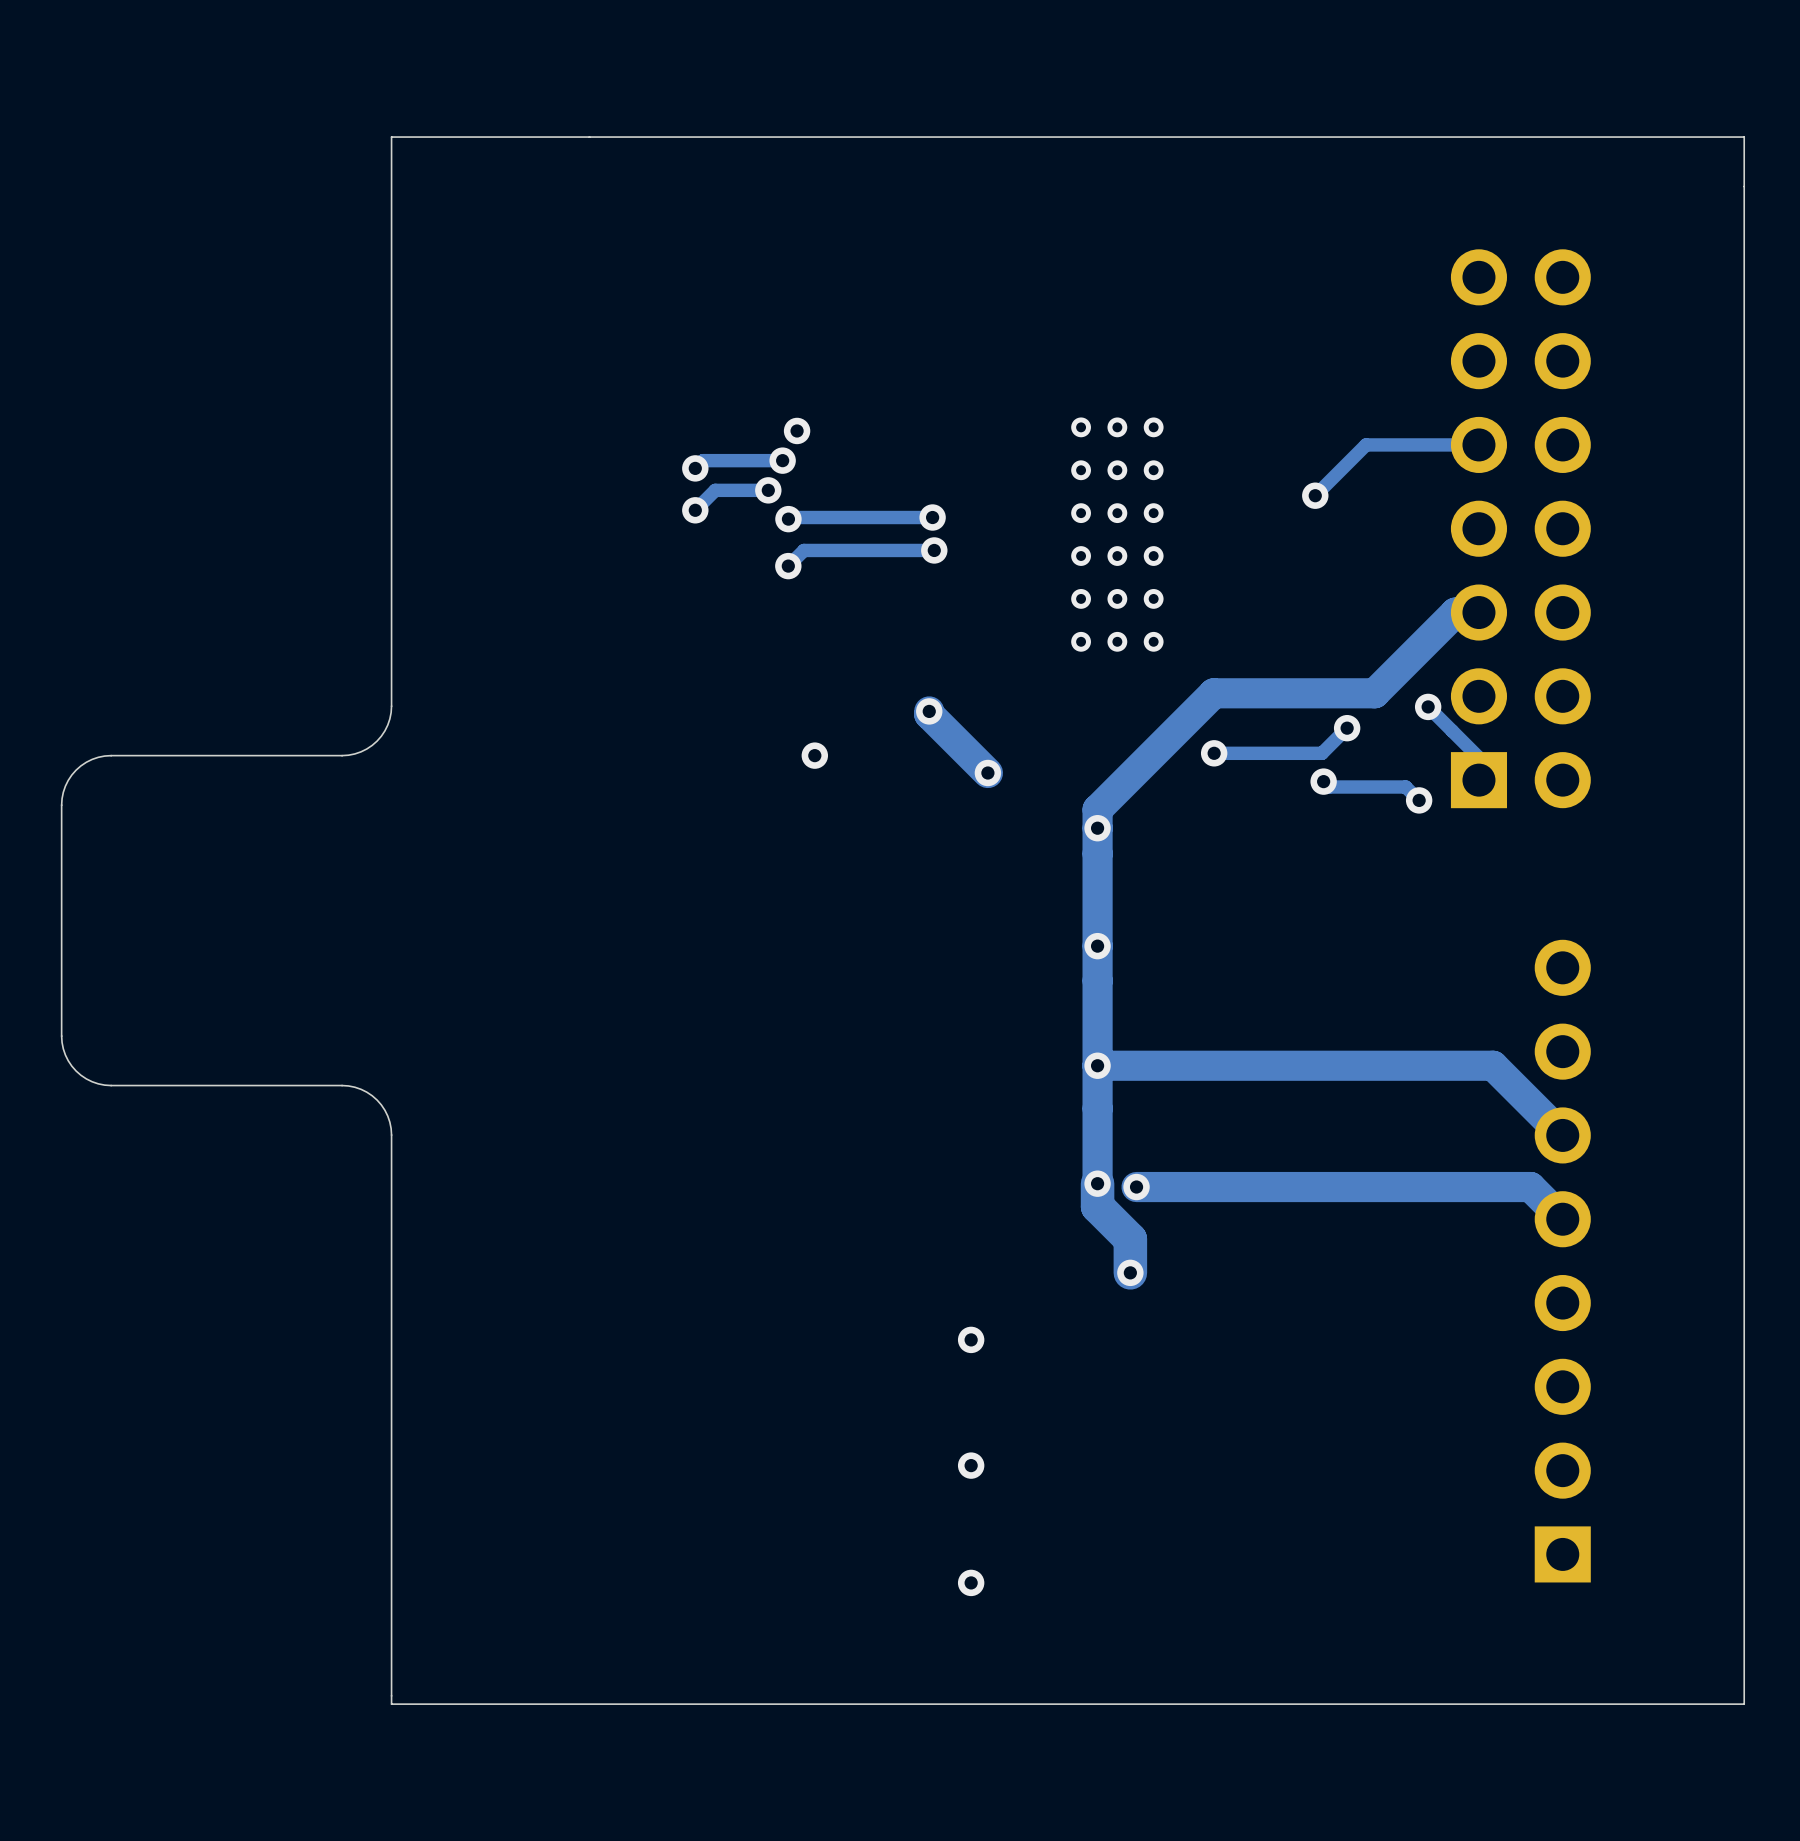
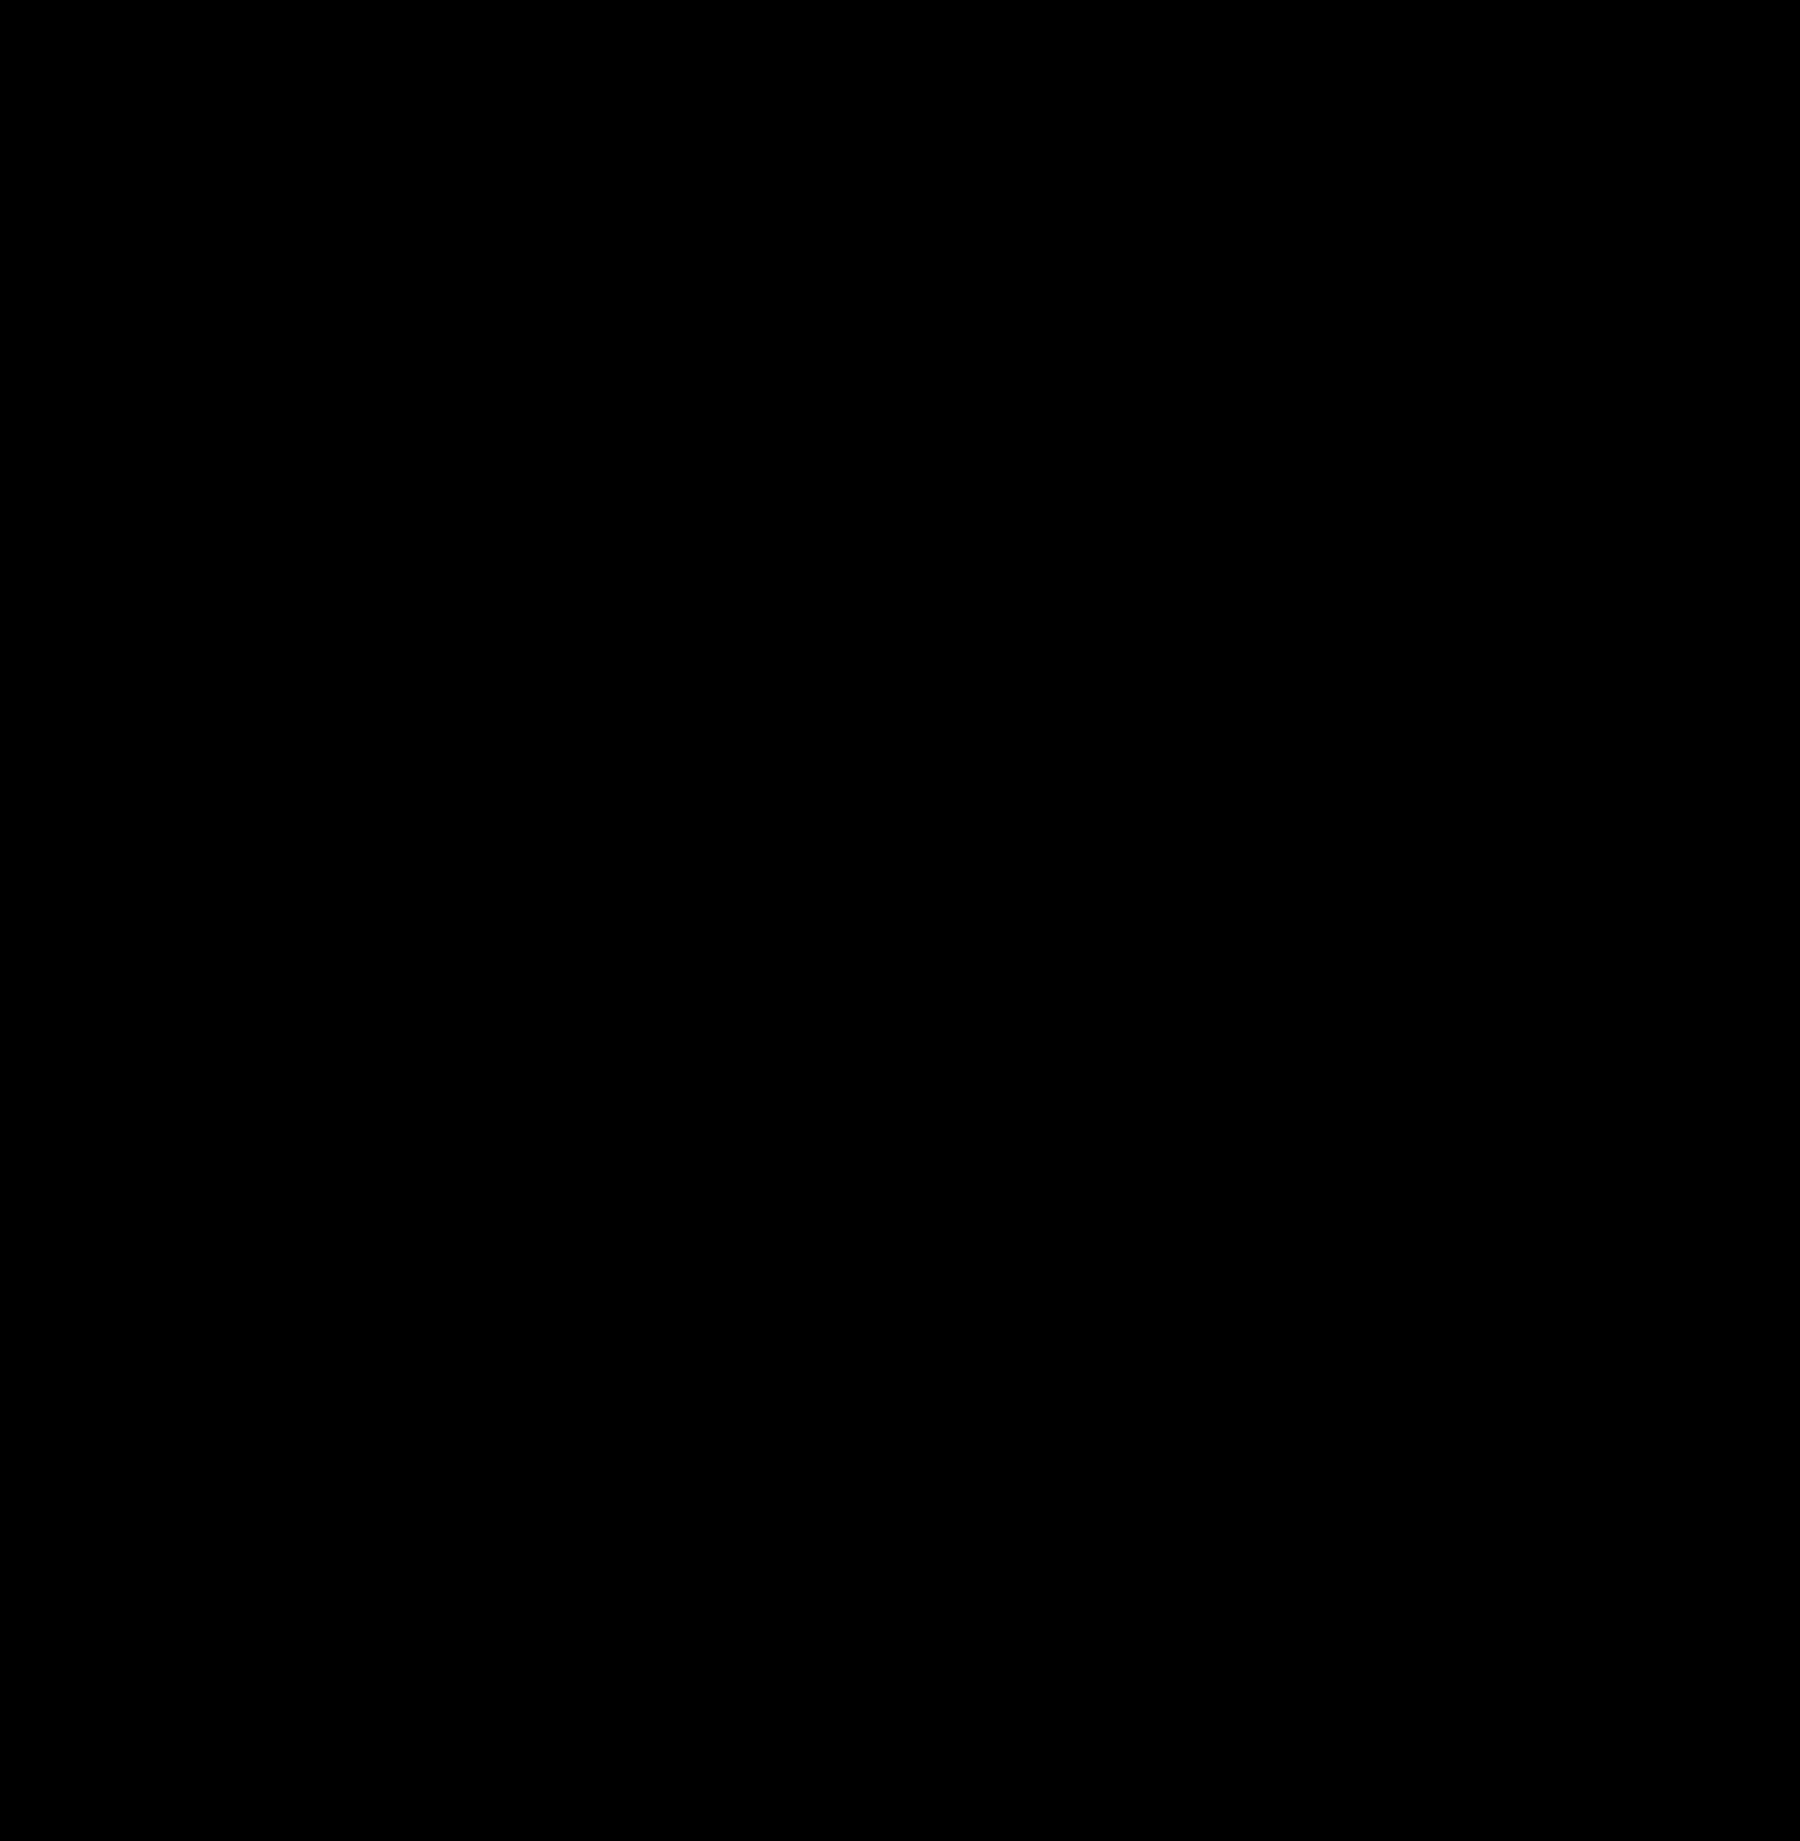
board edge: (1744, 137) (391, 137) (391, 706) (389, 718) (384, 730) (372, 745) (361, 751) (348, 755) (111, 755) (98, 757) (81, 765) (71, 774) (63, 792) (61, 805) (61, 1036) (65, 1054) (76, 1071) (92, 1081) (111, 1085) (348, 1085) (361, 1089) (372, 1095) (381, 1104) (387, 1116) (391, 1135) (391, 1704) (1744, 1704) (1744, 137) -> none
via: (1081, 427) -> none
via: (1117, 427) -> none
via: (1153, 427) -> none
via: (797, 430) -> none
track: (1478, 444) (1366, 444) (1315, 495) -> none
track: (782, 460) (703, 460) (695, 468) -> none
via: (782, 460) -> none
via: (695, 468) -> none
via: (1081, 470) -> none
via: (1117, 470) -> none
via: (1153, 470) -> none
track: (768, 490) (715, 490) (695, 510) -> none
via: (768, 490) -> none
via: (1315, 495) -> none
via: (695, 510) -> none
via: (1081, 513) -> none
via: (1117, 513) -> none
via: (1153, 513) -> none
track: (932, 517) (790, 517) (788, 519) -> none
via: (932, 517) -> none
via: (788, 519) -> none
part: (1520, 528) -> none
track: (934, 550) (803, 550) (788, 566) -> none
via: (934, 550) -> none
via: (1081, 556) -> none
via: (1117, 556) -> none
via: (1153, 556) -> none
via: (788, 566) -> none
via: (1081, 598) -> none
via: (1117, 598) -> none
via: (1153, 598) -> none
track: (1478, 612) (1455, 612) (1374, 693) (1213, 693) (1097, 809) (1097, 1206) (1130, 1239) (1130, 1272) -> none
via: (1081, 641) -> none
via: (1117, 641) -> none
via: (1153, 641) -> none
track: (1428, 706) (1478, 757) (1478, 780) -> none
via: (1428, 706) -> none
track: (929, 711) (929, 714) (987, 773) -> none
via: (929, 711) -> none
track: (1347, 728) (1321, 753) (1214, 753) -> none
via: (1347, 728) -> none
via: (1214, 753) -> none
via: (814, 755) -> none
via: (987, 773) -> none
track: (1323, 781) (1329, 787) (1405, 787) (1419, 800) -> none
via: (1323, 781) -> none
via: (1419, 800) -> none
via: (1097, 828) -> none
via: (1097, 946) -> none
track: (1097, 1065) (1493, 1065) (1562, 1135) -> none
via: (1097, 1065) -> none
via: (1097, 1183) -> none
track: (1136, 1187) (1530, 1187) (1562, 1219) -> none
via: (1136, 1187) -> none
part: (1562, 1261) -> none
via: (1130, 1272) -> none
via: (971, 1339) -> none
via: (971, 1465) -> none
via: (971, 1582) -> none

